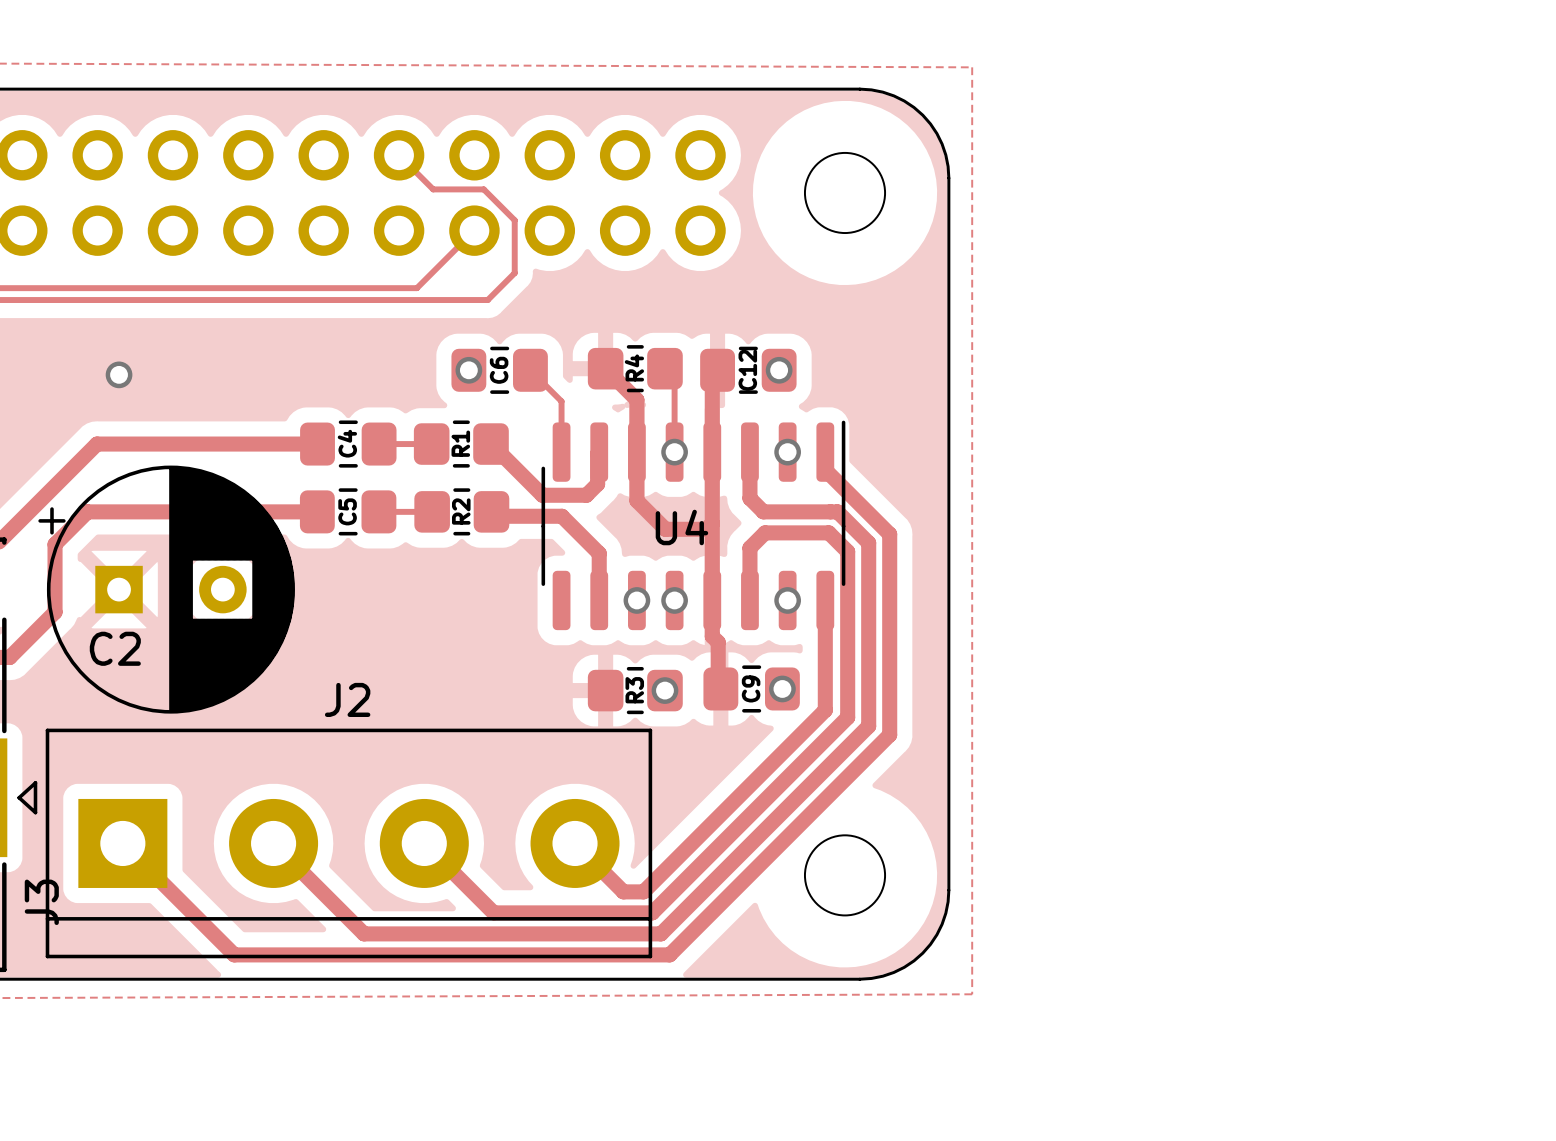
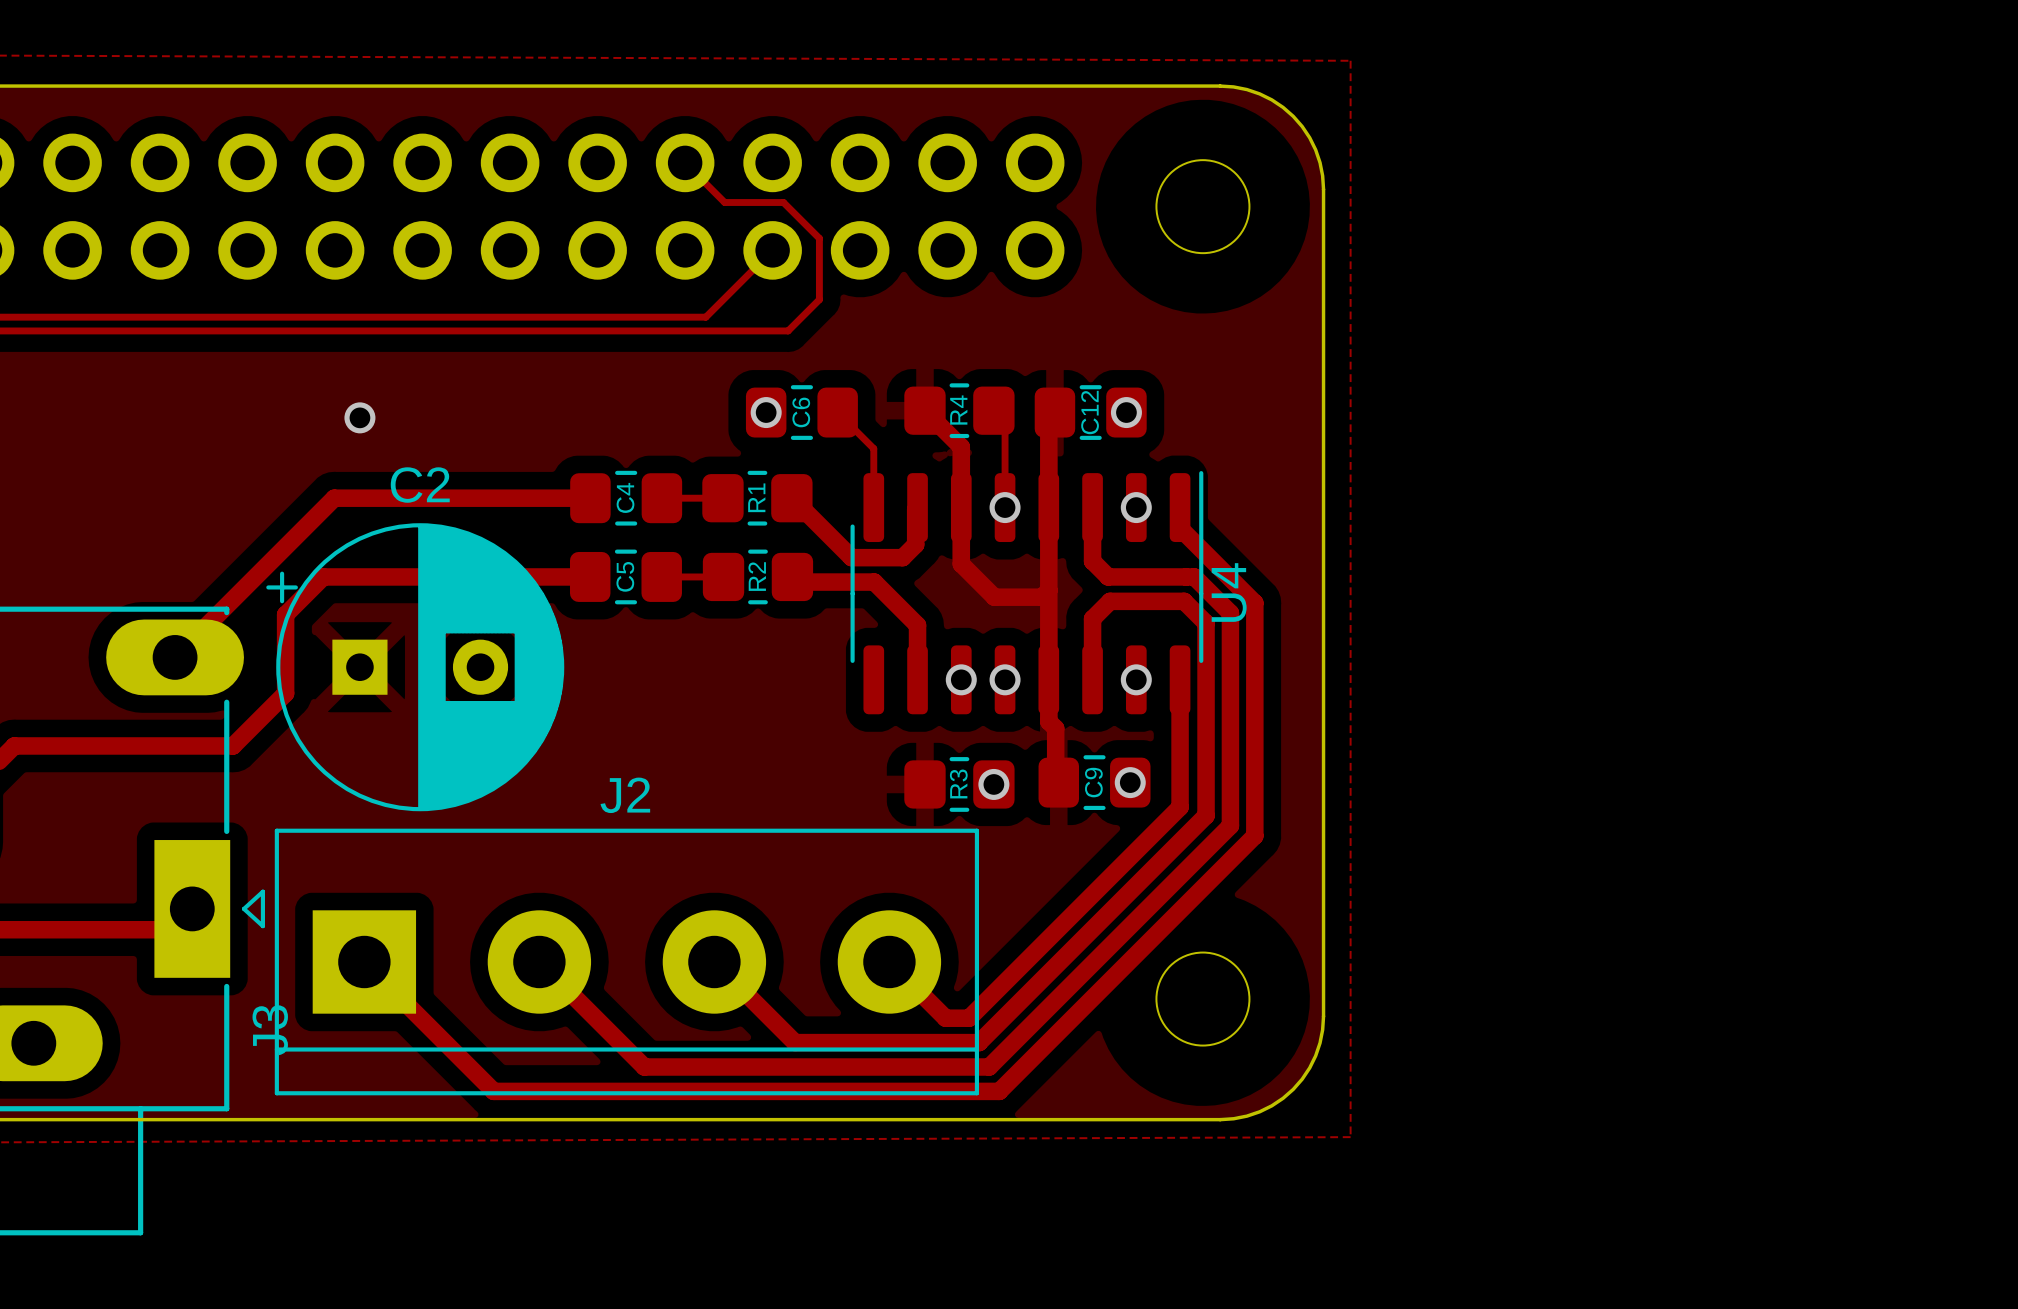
U4 name rotation: 0° (681, 527) -> 90° counterclockwise (1229, 592)
U4 name position: U4 (681, 527) -> U4 (1229, 592)
C2 name position: C2 (115, 648) -> C2 (420, 485)

